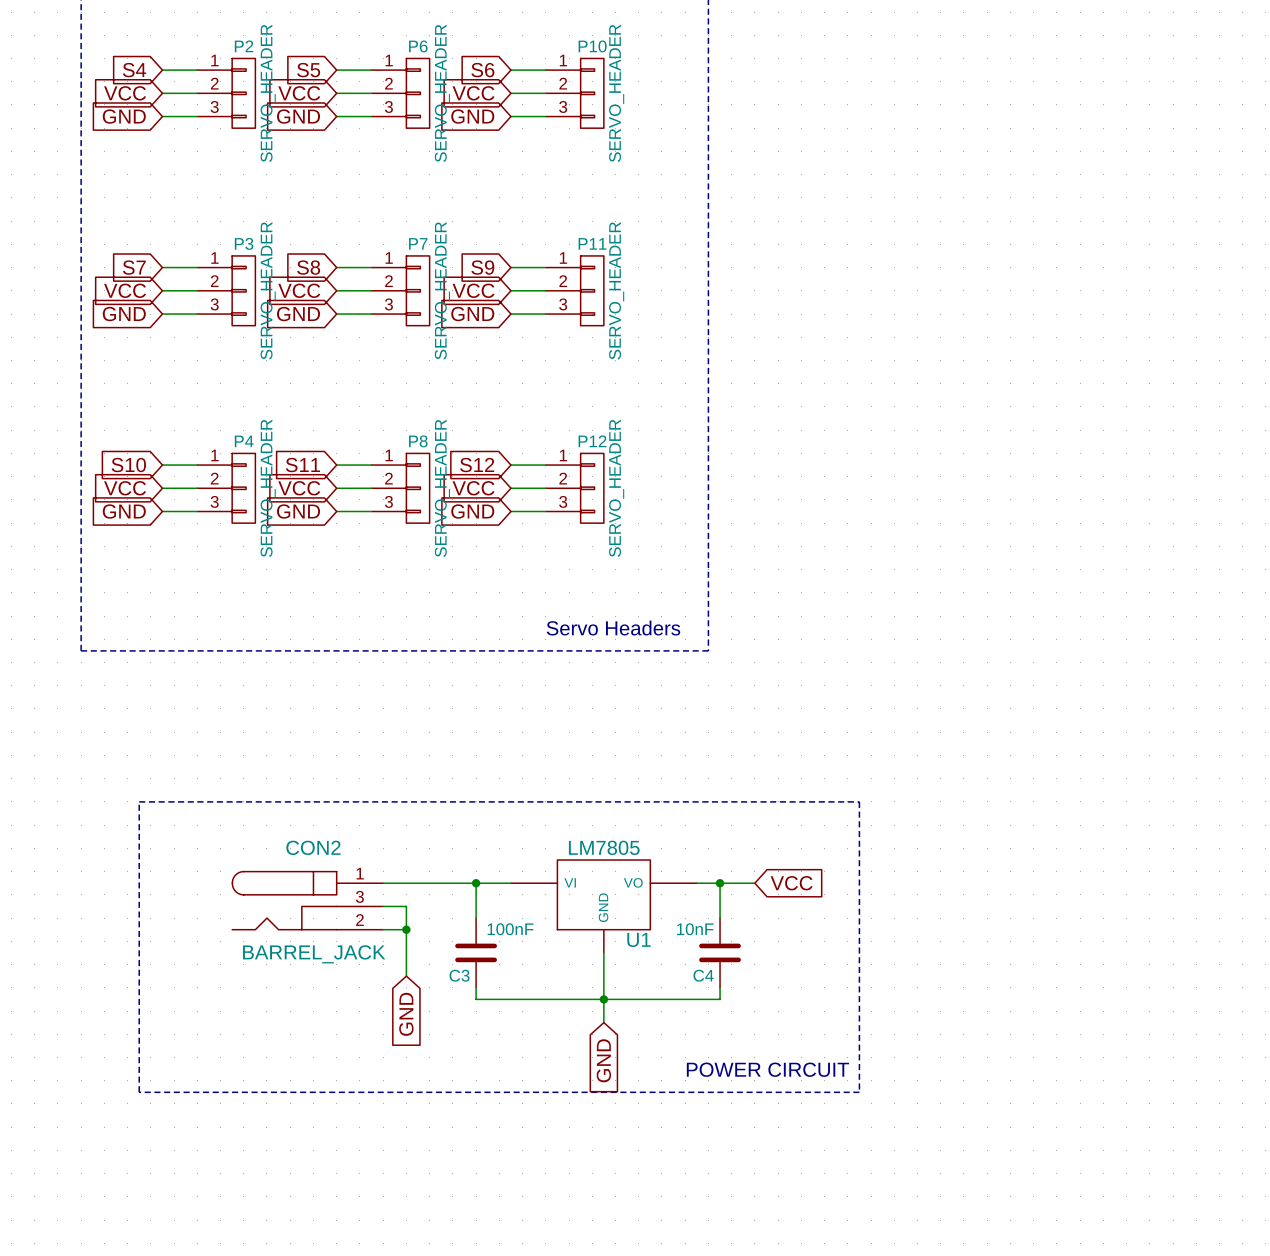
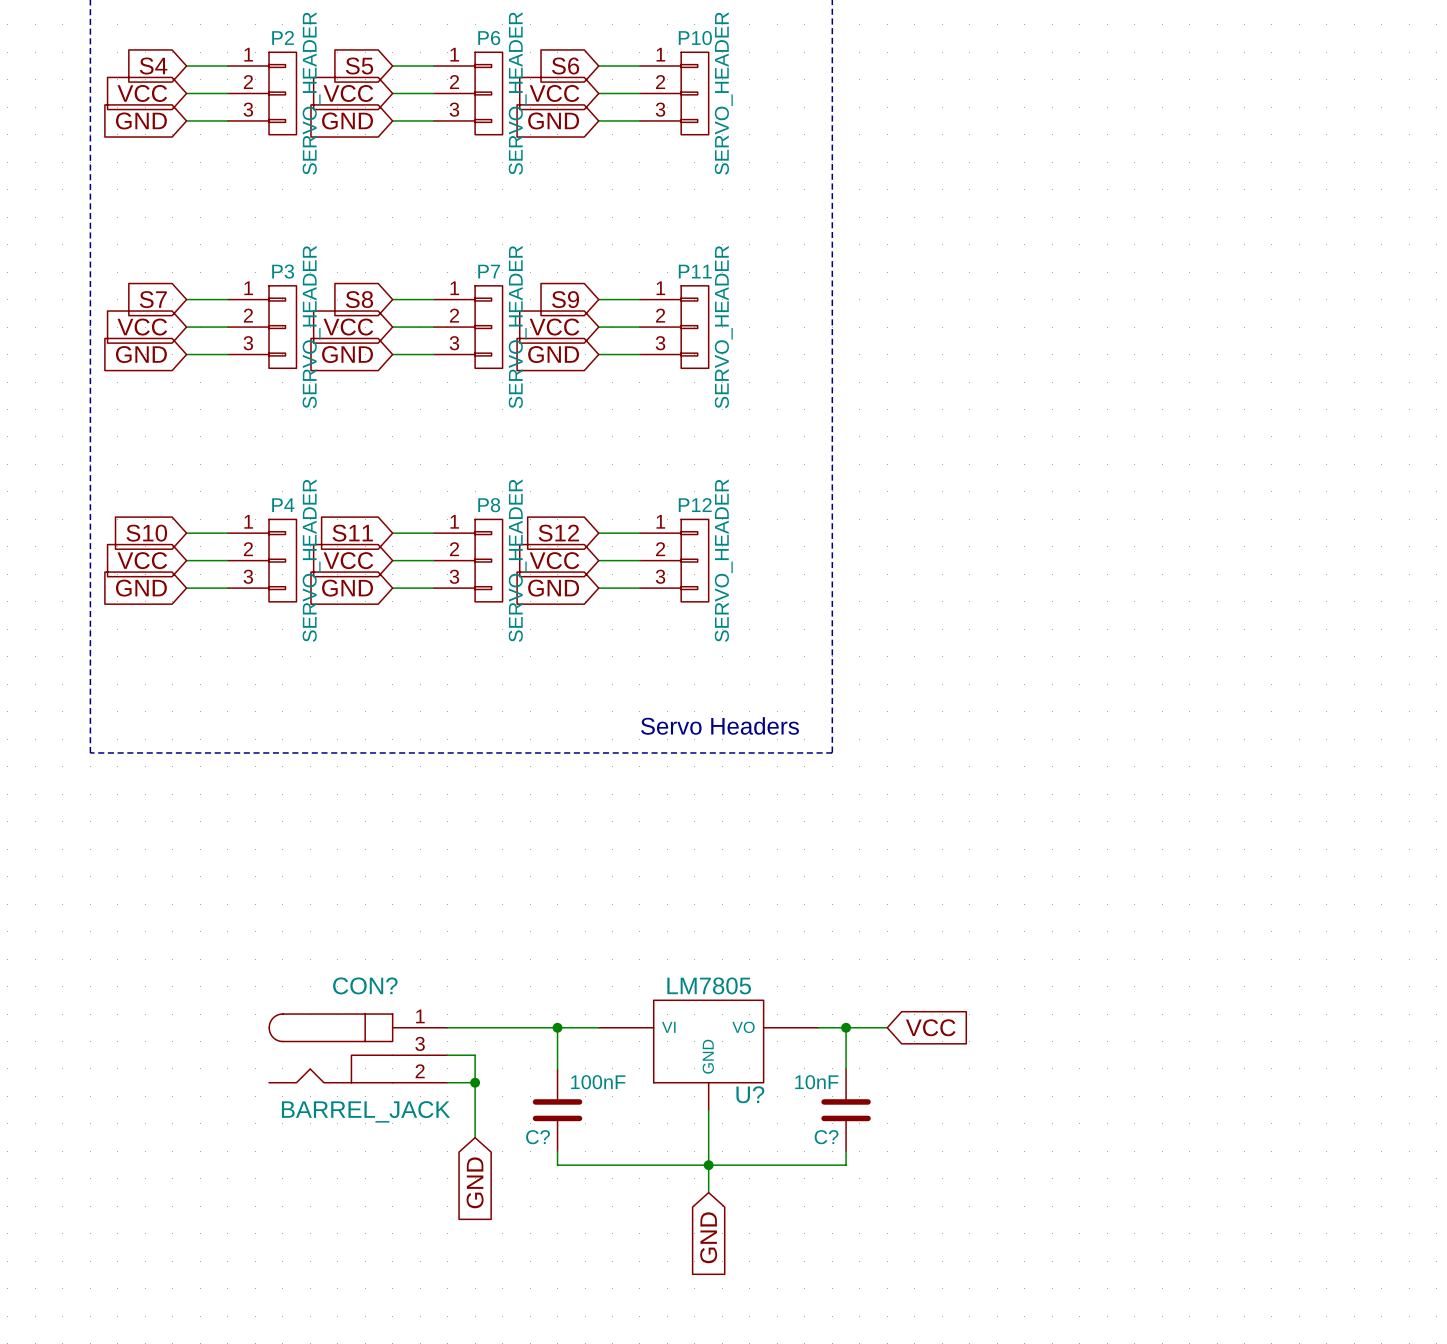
line: (139, 801) (139, 1092) (859, 1092) (859, 801) (139, 801) -> none
CON2 name: CON2 (313, 847) -> CON? (365, 985)
U1 name: U1 (639, 939) -> U? (750, 1094)
C3 name: C3 (459, 975) -> C? (538, 1137)
C4 name: C4 (703, 975) -> C? (826, 1137)
text: POWER CIRCUIT (767, 1069) -> none

